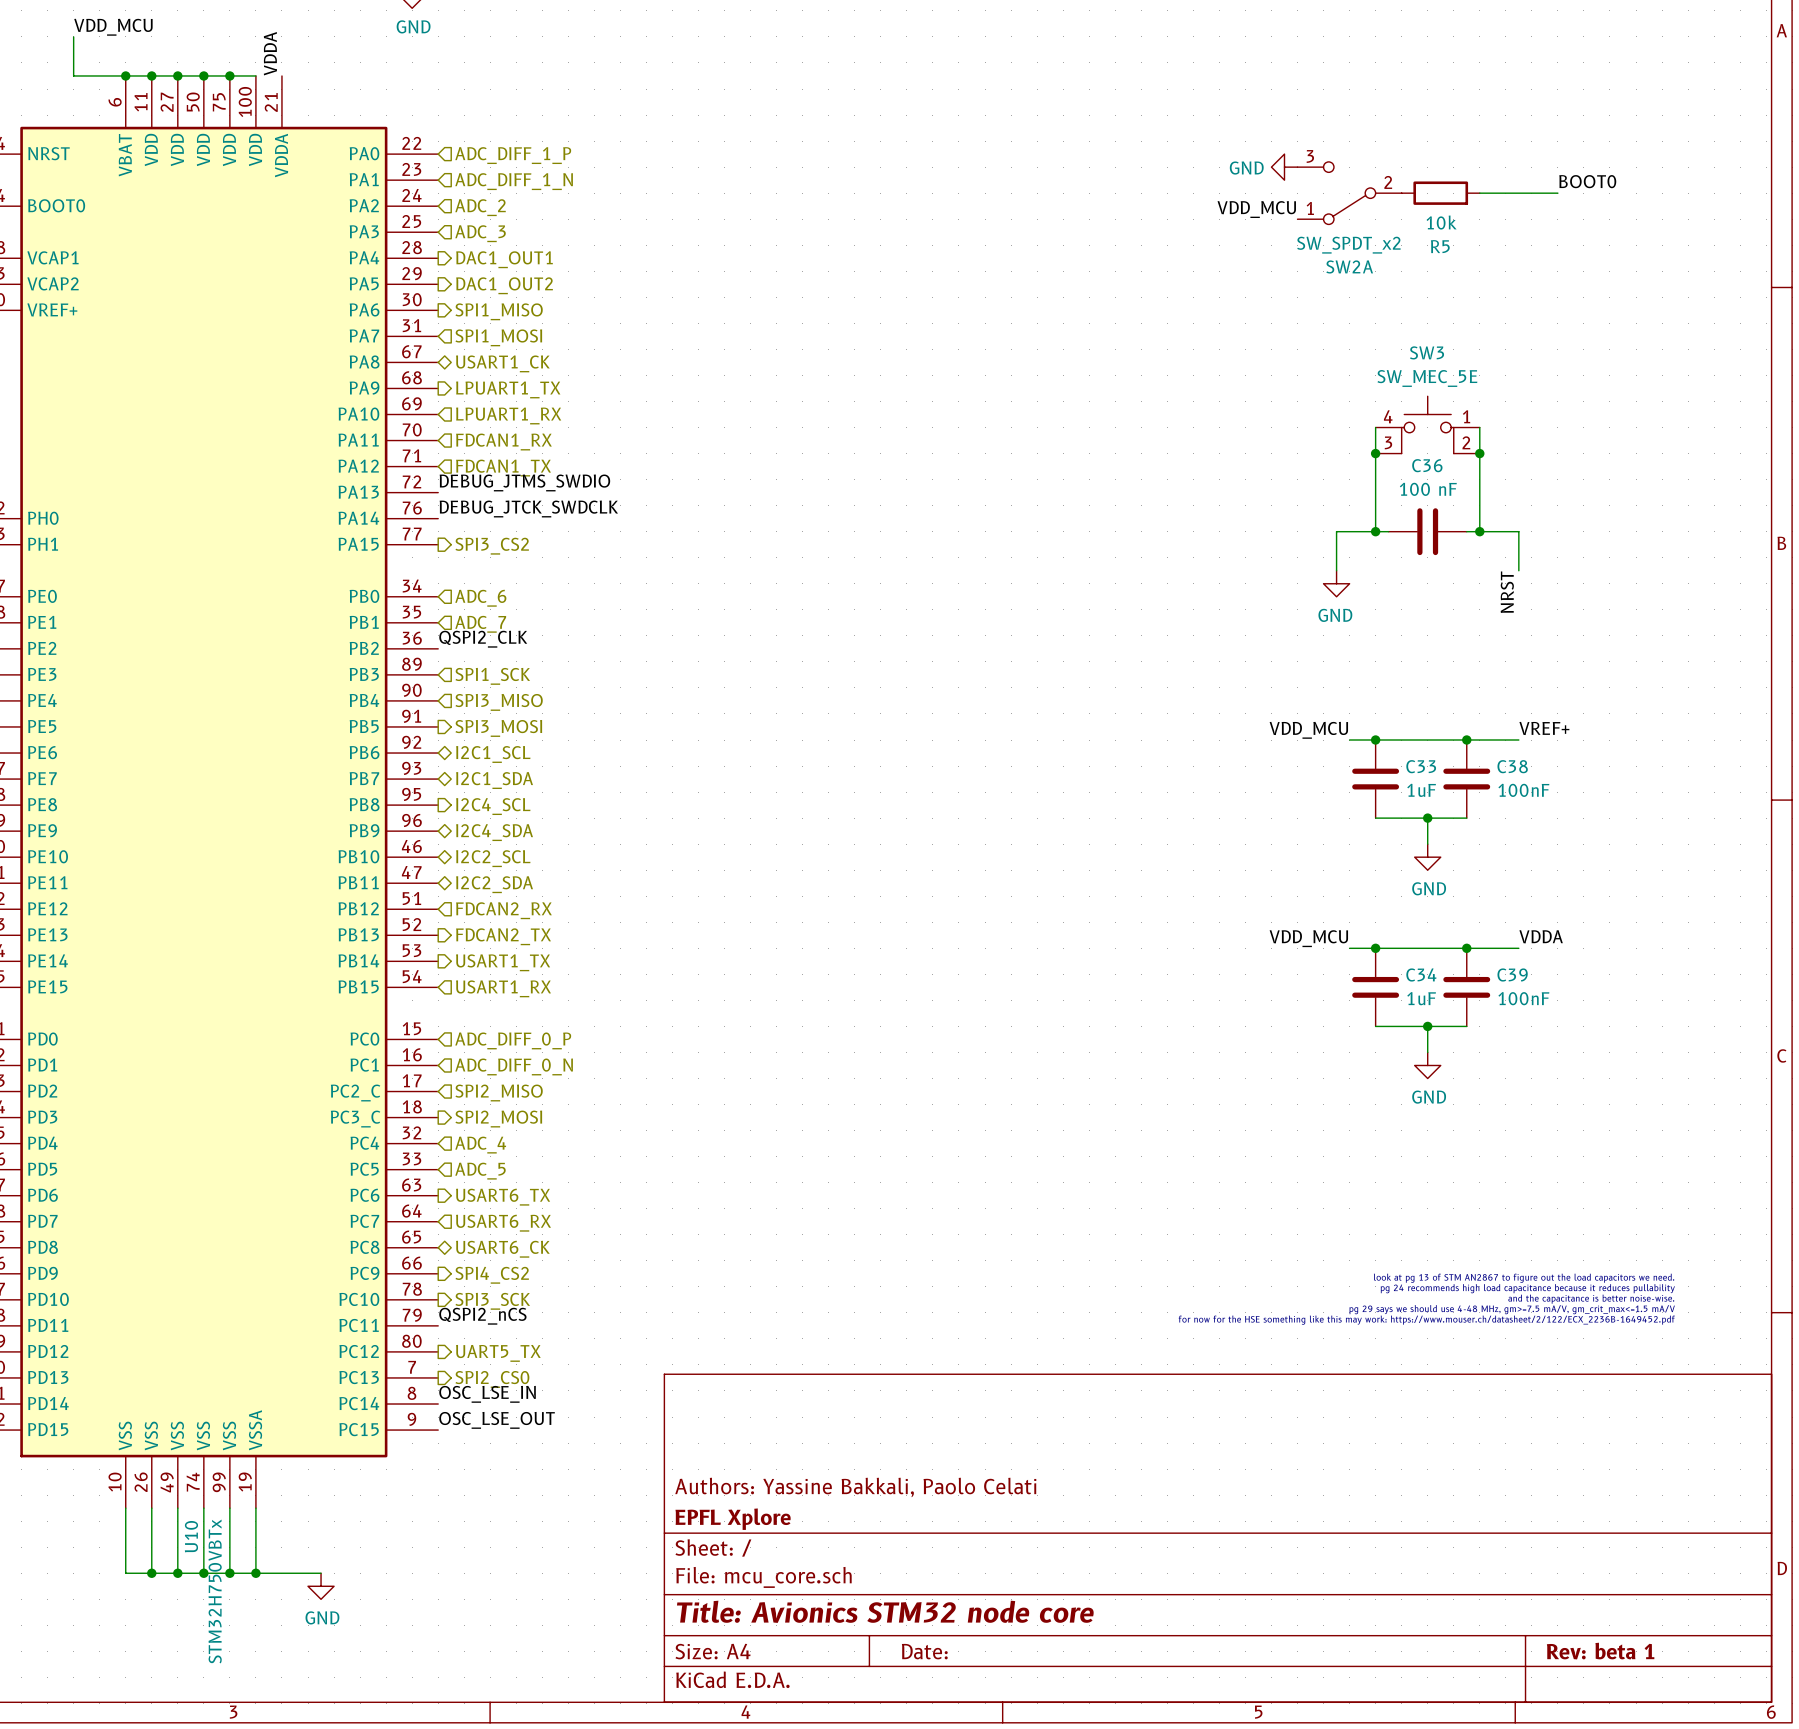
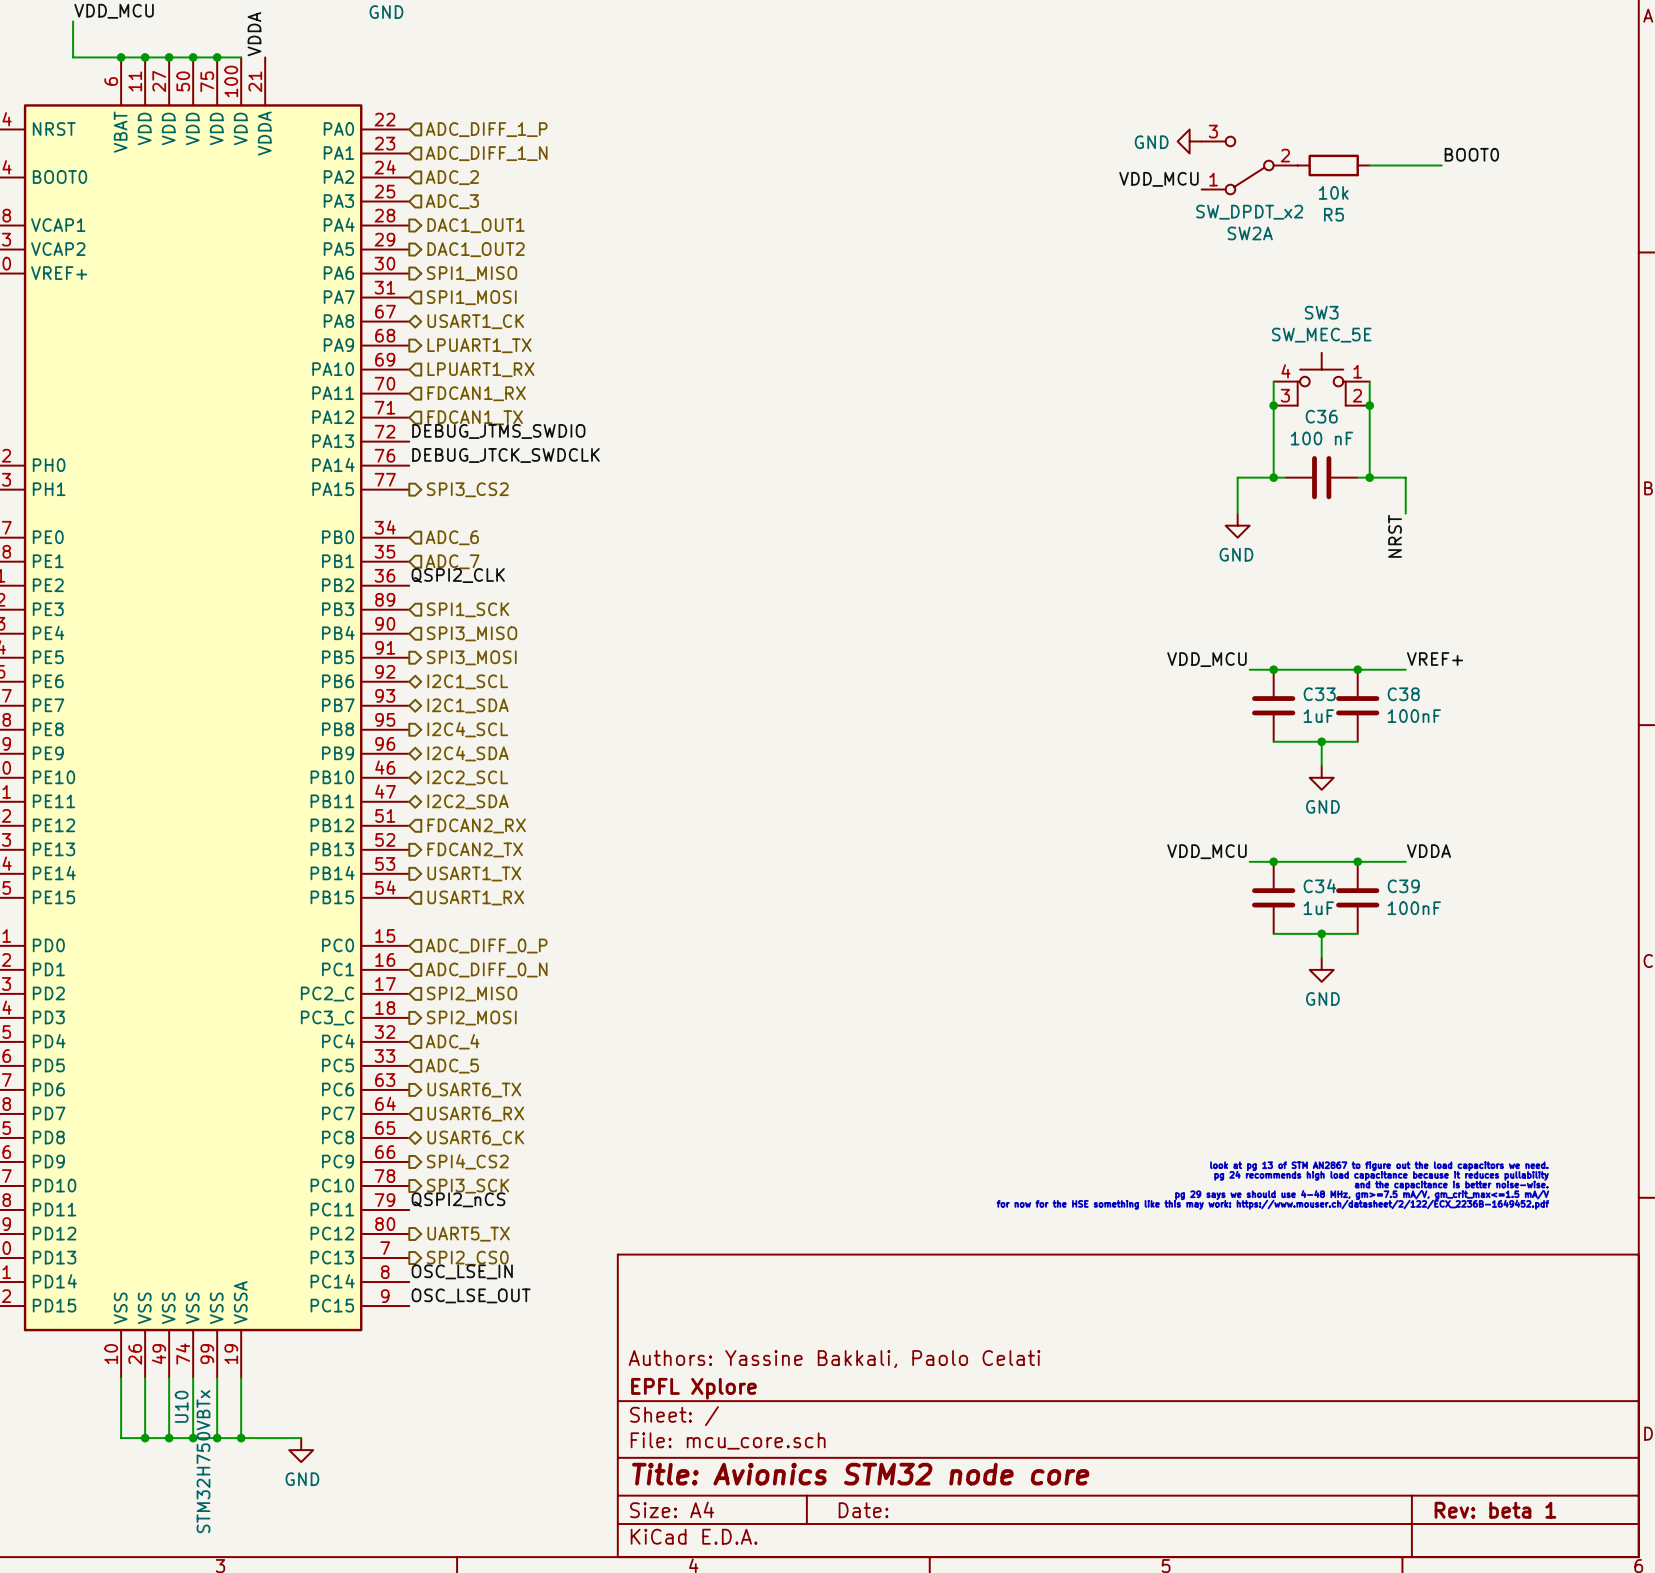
SW2A value: SW_SPDT_x2 (1348, 245) -> SW_DPDT_x2 (1249, 212)

